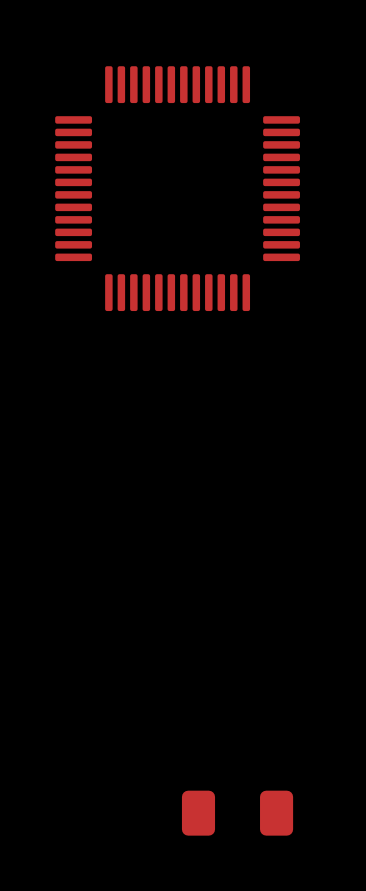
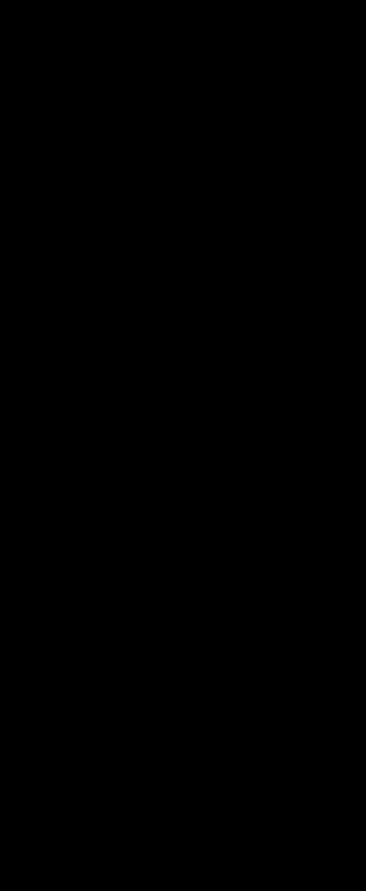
part: (177, 188) -> none
part: (237, 813) -> none

